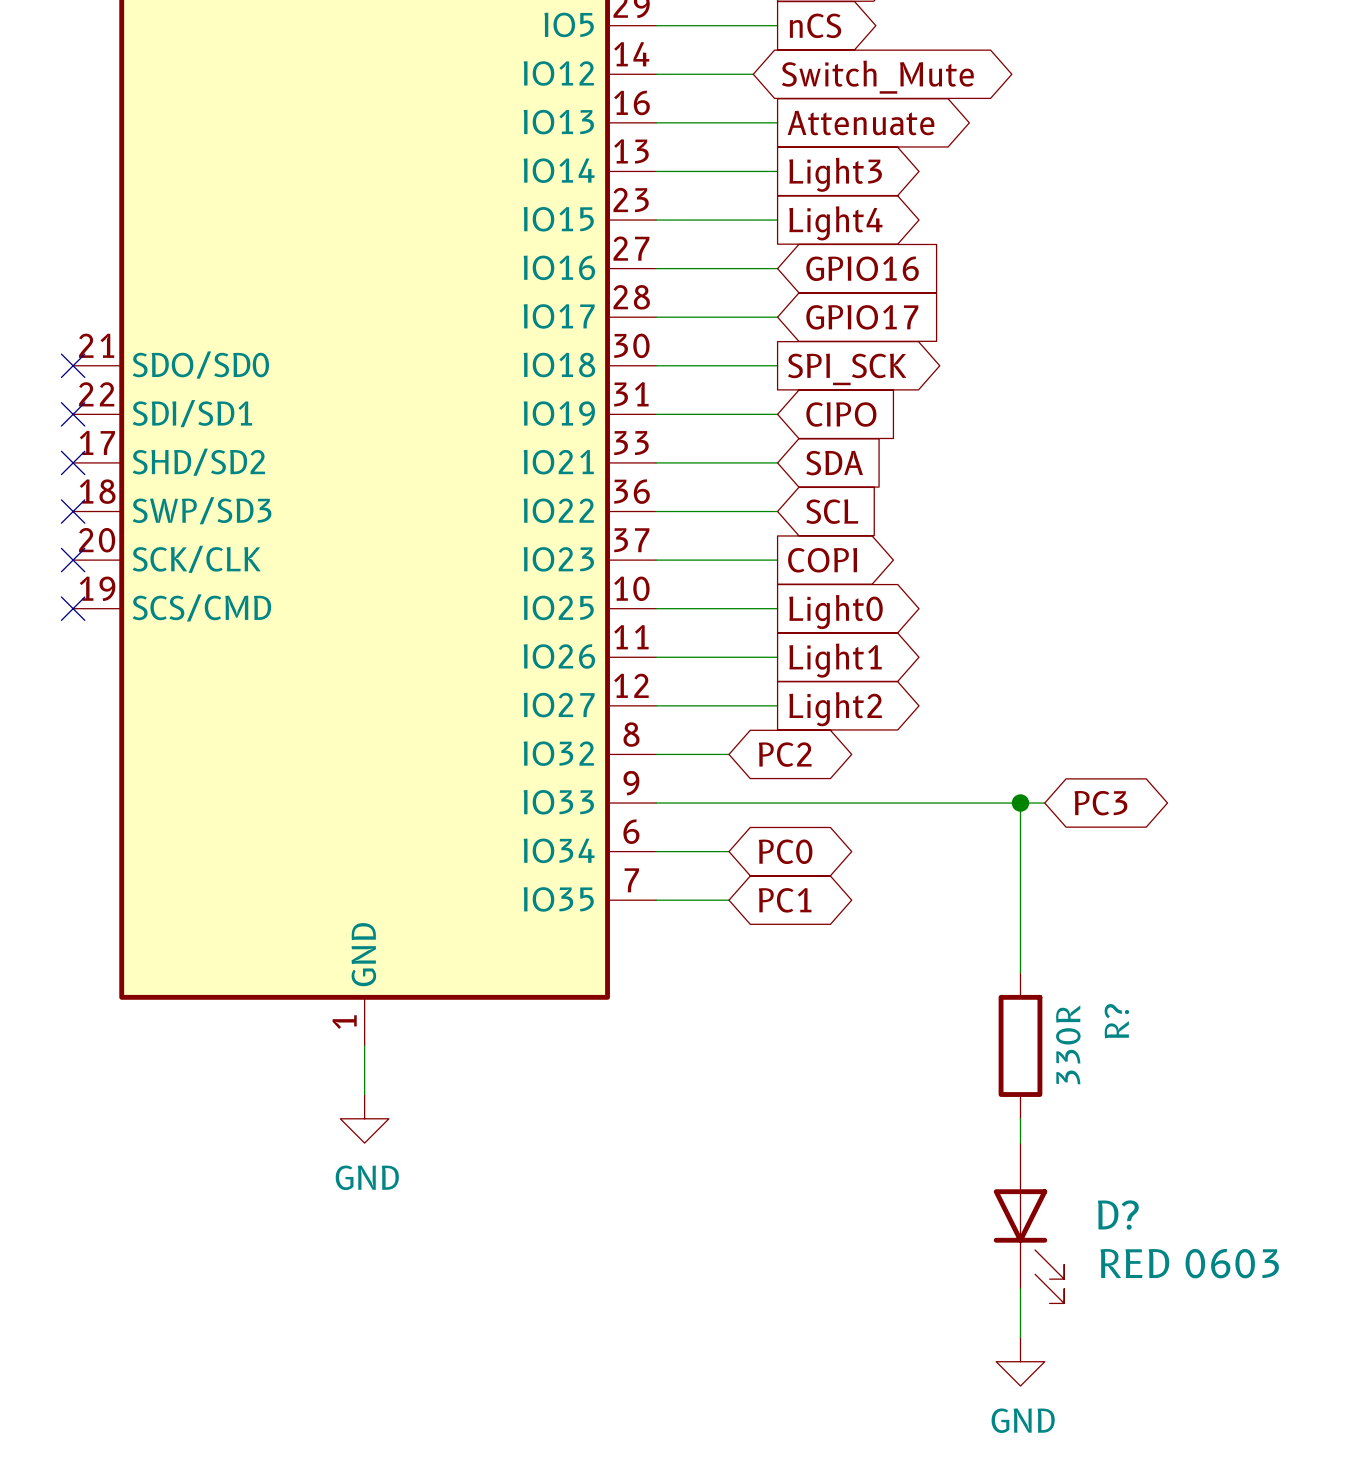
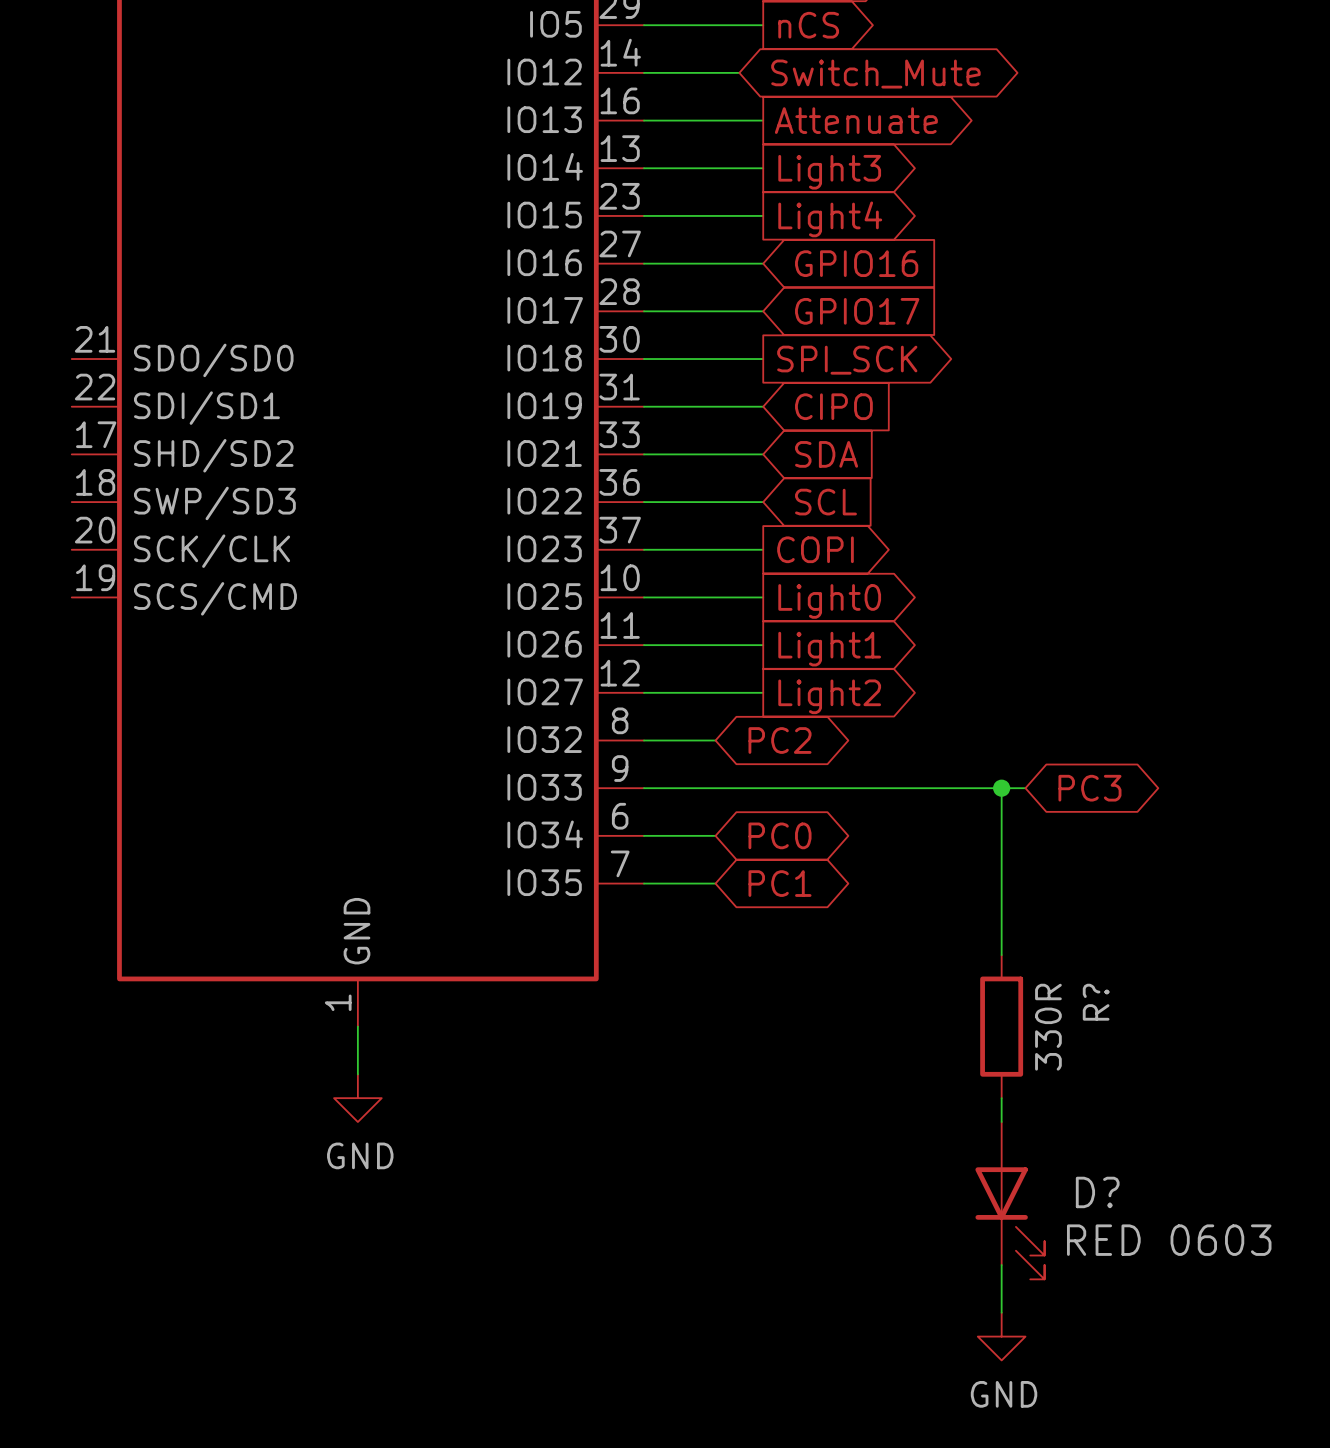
no-connect mark: (73, 365) -> none
no-connect mark: (73, 414) -> none
no-connect mark: (73, 462) -> none
no-connect mark: (73, 511) -> none
no-connect mark: (73, 560) -> none
no-connect mark: (73, 608) -> none

